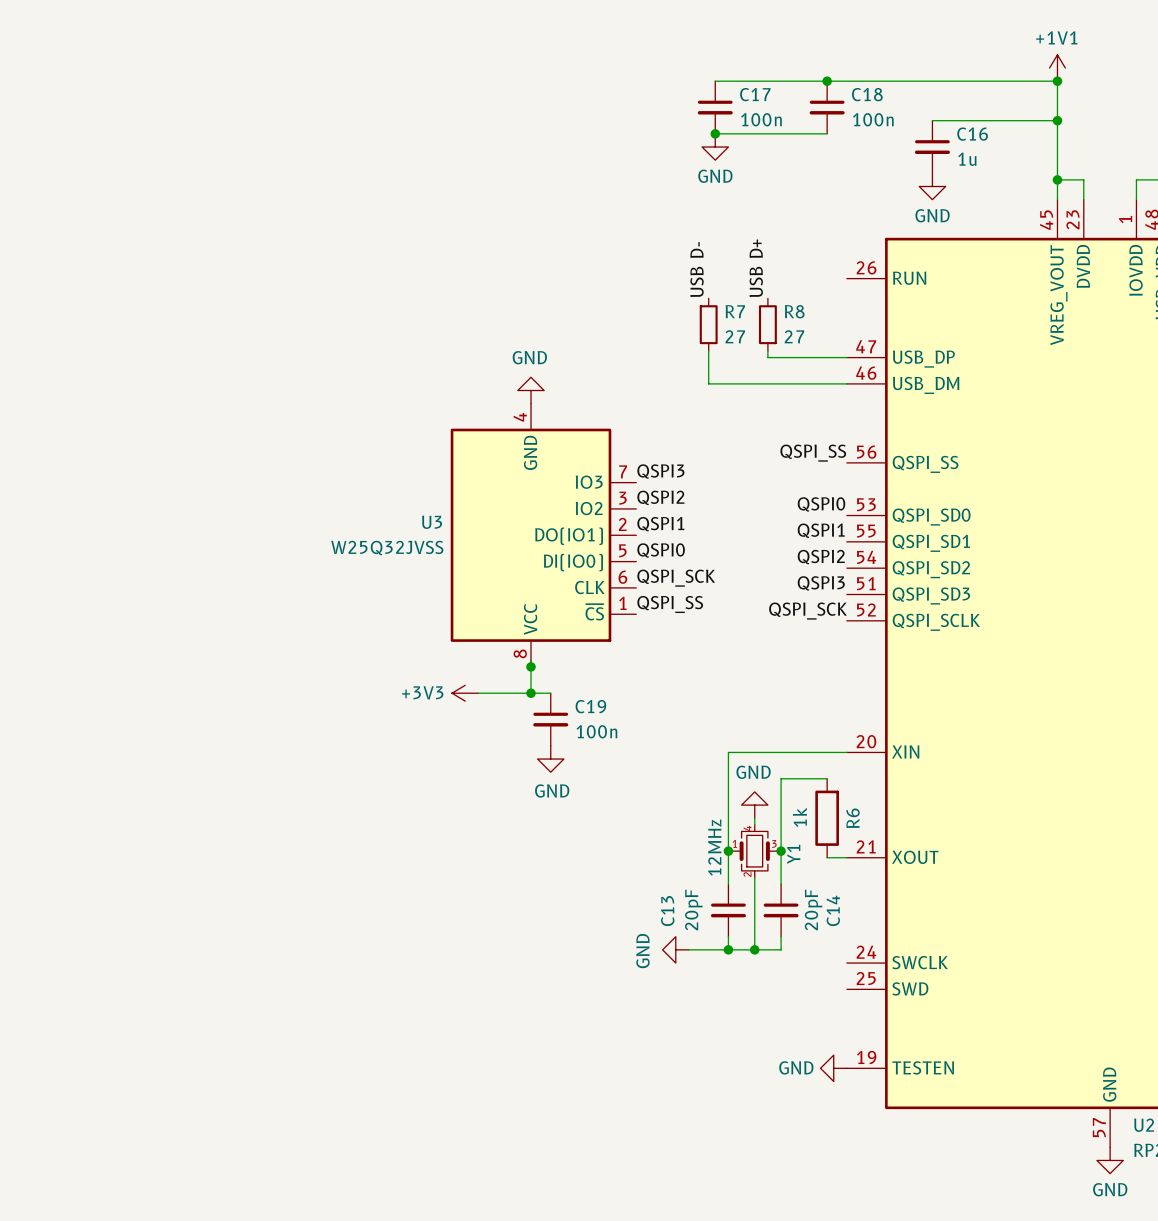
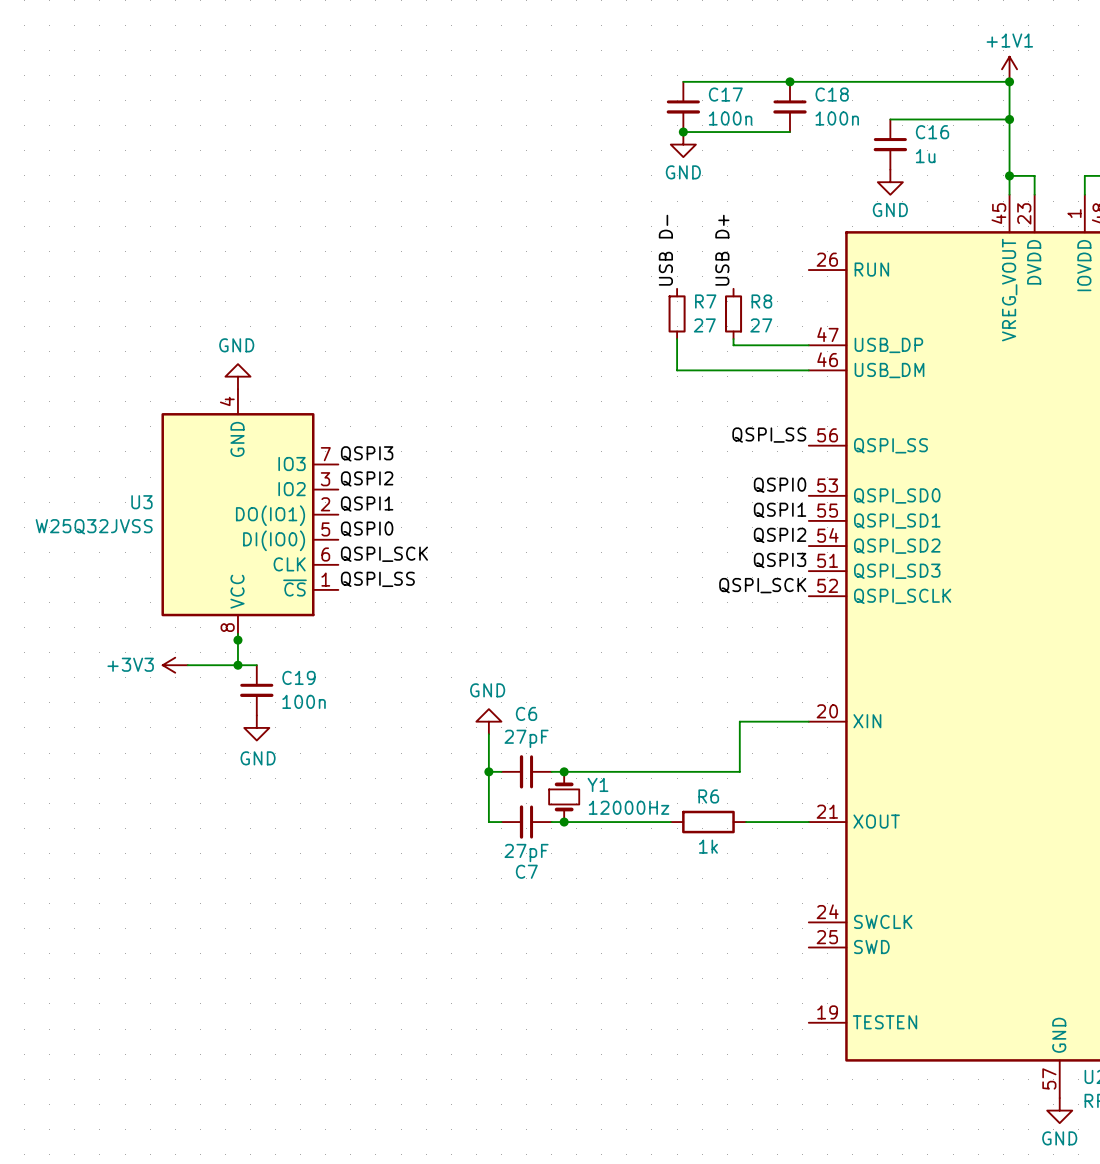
power symbol: none -> GND (237, 376)
power symbol: GND (531, 390) -> none
label: none -> QSPI3 (367, 453)
label: QSPI3 (660, 471) -> none
label: none -> QSPI2 (367, 478)
label: QSPI2 (660, 497) -> none
label: none -> QSPI1 (367, 504)
label: QSPI1 (660, 524) -> none
U3 position: (543, 535) -> (249, 514)
label: none -> QSPI0 (367, 529)
label: QSPI0 (661, 550) -> none
label: none -> QSPI_SCK (384, 554)
label: QSPI_SCK (676, 578) -> none
label: none -> QSPI_SS (377, 579)
label: QSPI_SS (670, 604) -> none
wire: none -> (237, 633) (237, 665)
wire: (531, 660) (531, 693) -> none
junction: none -> (237, 640)
junction: (531, 666) -> none
power symbol: none -> +3V3 (175, 665)
wire: none -> (187, 665) (256, 665)
junction: none -> (237, 665)
power symbol: +3V3 (465, 693) -> none
wire: (478, 693) (550, 693) -> none
junction: (531, 693) -> none
C19 position: (550, 719) -> (256, 690)
wire: (774, 752) (728, 752) (728, 884) -> (739, 721) (739, 771) (551, 771)
power symbol: none -> GND (256, 727)
power symbol rotation: 0° (550, 759) -> 180° (488, 721)
power symbol position: GND (550, 759) -> GND (488, 721)
wire: none -> (488, 734) (488, 822) (501, 822)
wire: (827, 778) (781, 778) (781, 884) -> none
wire: none -> (488, 771) (501, 771)
junction: none -> (488, 771)
C6: none -> 27pF (526, 771)
junction: none -> (564, 771)
power symbol: GND (754, 805) -> none
R6 value position: 1k (799, 817) -> 1k (708, 846)
wire: (754, 818) (754, 824) -> none
R6 rotation: 0° (827, 818) -> 90° clockwise (708, 822)
R6 position: (827, 818) -> (708, 822)
R6 name position: R6 (853, 818) -> R6 (708, 796)
Y1 symbol: [728, 824, 782, 878] -> [549, 771, 580, 823]
Y1 value: 12MHz (714, 847) -> 12000Hz (629, 807)
junction: (728, 851) -> none
junction: (781, 851) -> none
C7: none -> 27pF (526, 822)
wire: none -> (551, 822) (670, 822)
junction: none -> (564, 822)
wire: none -> (746, 822) (789, 822)
wire: (754, 877) (754, 949) -> none
C13: 20pF (728, 910) -> none
C14: 20pF (781, 910) -> none
wire: (728, 936) (728, 949) -> none
wire: (781, 936) (781, 949) (688, 949) -> none
power symbol: GND (675, 949) -> none
junction: (728, 949) -> none
junction: (754, 949) -> none
power symbol: GND (833, 1068) -> none

